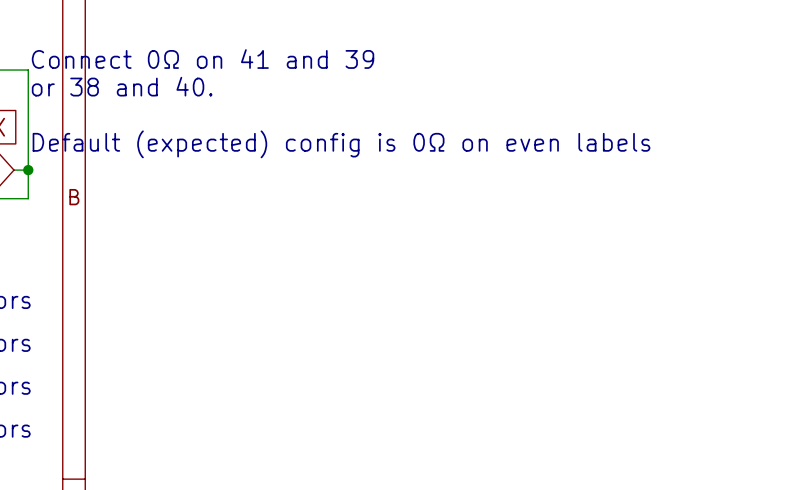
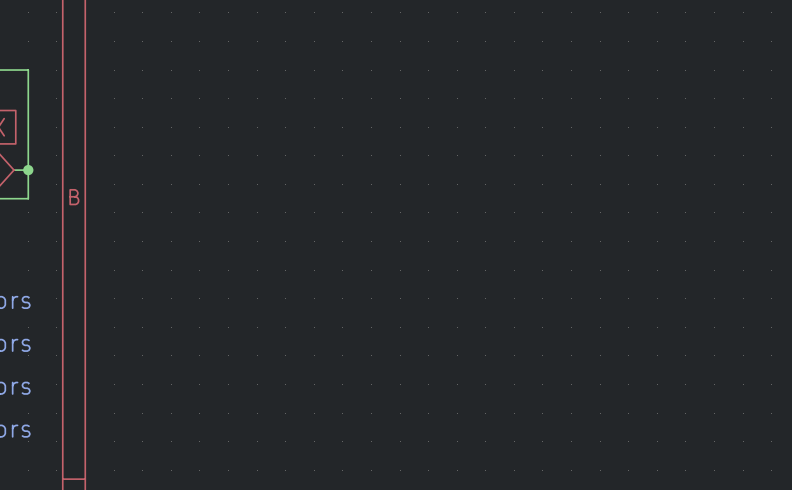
text: Connect 0Ω on 41 and 39 (203, 59) -> none
text: or 38 and 40. (122, 86) -> none
text: Default (expected) config is 0Ω on even labels (341, 144) -> none

